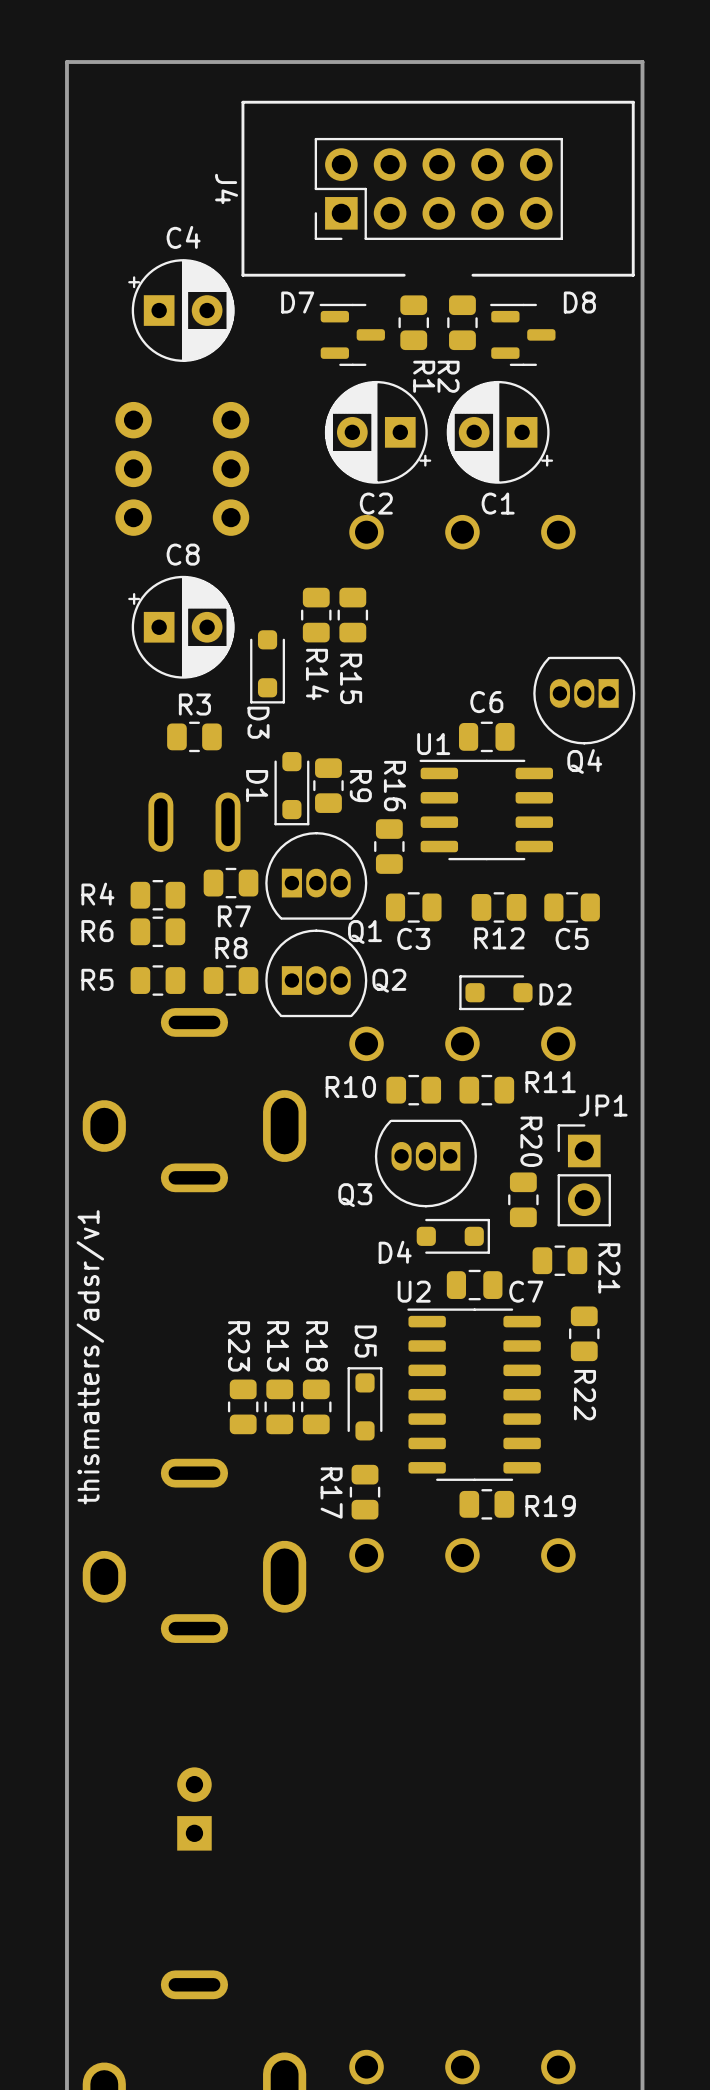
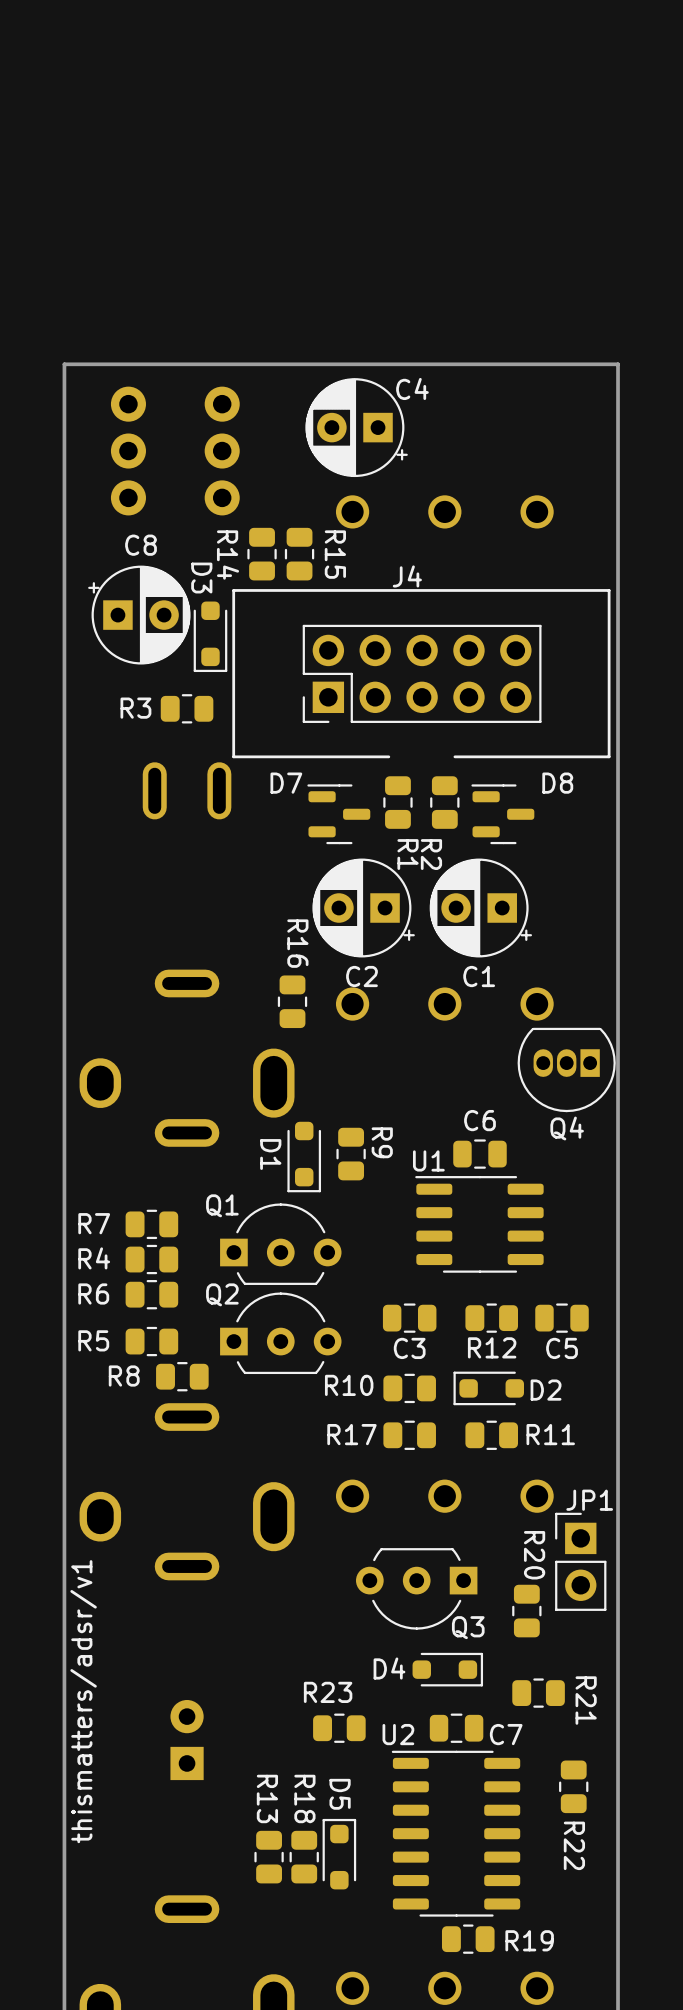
J4 name rotation: 0° (226, 188) -> 90° counterclockwise (407, 576)
J4 name position: J4 (226, 188) -> J4 (407, 576)
J4 position: (438, 188) -> (421, 673)
C4 name position: C4 (183, 237) -> C4 (412, 388)
C4 rotation: 0° (181, 310) -> 180° (356, 427)
C4 position: (181, 310) -> (356, 427)
R1 position: (413, 322) -> (397, 802)
R2 position: (462, 322) -> (444, 802)
D7 position: (352, 334) -> (338, 814)
D8 position: (522, 334) -> (502, 814)
board edge: (642, 378) (642, 62) (66, 62) (66, 378) -> (618, 364) (64, 364)
C2 position: (378, 432) -> (363, 908)
C1 position: (499, 432) -> (480, 908)
R14 position: (316, 615) -> (262, 554)
R15 position: (352, 615) -> (299, 554)
C8 position: (181, 627) -> (139, 615)
D3 position: (267, 666) -> (210, 636)
R14 name position: R14 (317, 674) -> R14 (228, 555)
R15 name position: R15 (351, 678) -> R15 (335, 554)
Q4 position: (584, 700) -> (566, 1069)
R3 name position: R3 (194, 704) -> R3 (135, 708)
D3 name position: D3 (258, 722) -> D3 (201, 578)
C6 position: (486, 736) -> (479, 1154)
R9 position: (328, 785) -> (351, 1154)
R9 name position: R9 (360, 786) -> R9 (382, 1142)
D1 position: (291, 788) -> (304, 1157)
U1 position: (486, 809) -> (479, 1224)
Q1 footprint: [265, 832, 368, 920] -> [220, 1203, 342, 1285]
R16 position: (389, 846) -> (292, 1001)
R7 position: (231, 883) -> (151, 1224)
R4 position: (157, 895) -> (151, 1259)
C3 position: (413, 907) -> (409, 1318)
R12 position: (499, 907) -> (491, 1318)
C5 position: (572, 907) -> (562, 1318)
R7 name position: R7 (234, 916) -> R7 (94, 1223)
Q2 footprint: [265, 929, 368, 1018] -> [220, 1292, 342, 1375]
R6 position: (157, 931) -> (151, 1294)
Q1 name position: Q1 (365, 931) -> Q1 (222, 1205)
R8 name position: R8 (231, 948) -> R8 (124, 1376)
R5 position: (157, 980) -> (151, 1341)
R8 position: (231, 980) -> (182, 1376)
Q2 name position: Q2 (389, 980) -> Q2 (222, 1294)
D2 position: (495, 992) -> (488, 1388)
R11 name position: R11 (550, 1082) -> R11 (550, 1434)
R10 position: (413, 1090) -> (409, 1388)
R11 position: (486, 1090) -> (491, 1435)
JP1 name position: JP1 (603, 1105) -> JP1 (589, 1500)
Q3 footprint: [374, 1119, 477, 1208] -> [356, 1548, 478, 1630]
JP1 position: (584, 1175) -> (580, 1561)
Q3 name position: Q3 (355, 1195) -> Q3 (468, 1627)
R20 position: (523, 1199) -> (526, 1611)
D4 position: (453, 1236) -> (447, 1669)
D4 name position: D4 (395, 1252) -> D4 (389, 1668)
R21 position: (559, 1260) -> (538, 1693)
C7 position: (474, 1285) -> (456, 1728)
R22 position: (584, 1333) -> (573, 1786)
text position: thismatters/adsr/v1 (90, 1357) -> thismatters/adsr/v1 (83, 1701)
U2 position: (474, 1394) -> (456, 1833)
D5 position: (365, 1403) -> (339, 1854)
R23 rotation: 0° (243, 1406) -> 90° clockwise (339, 1728)
R23 position: (243, 1406) -> (339, 1728)
R13 position: (279, 1406) -> (269, 1857)
R18 position: (316, 1406) -> (304, 1857)
R17 rotation: 0° (365, 1492) -> 90° clockwise (409, 1435)
R17 position: (365, 1492) -> (409, 1435)
R19 position: (486, 1504) -> (468, 1939)

